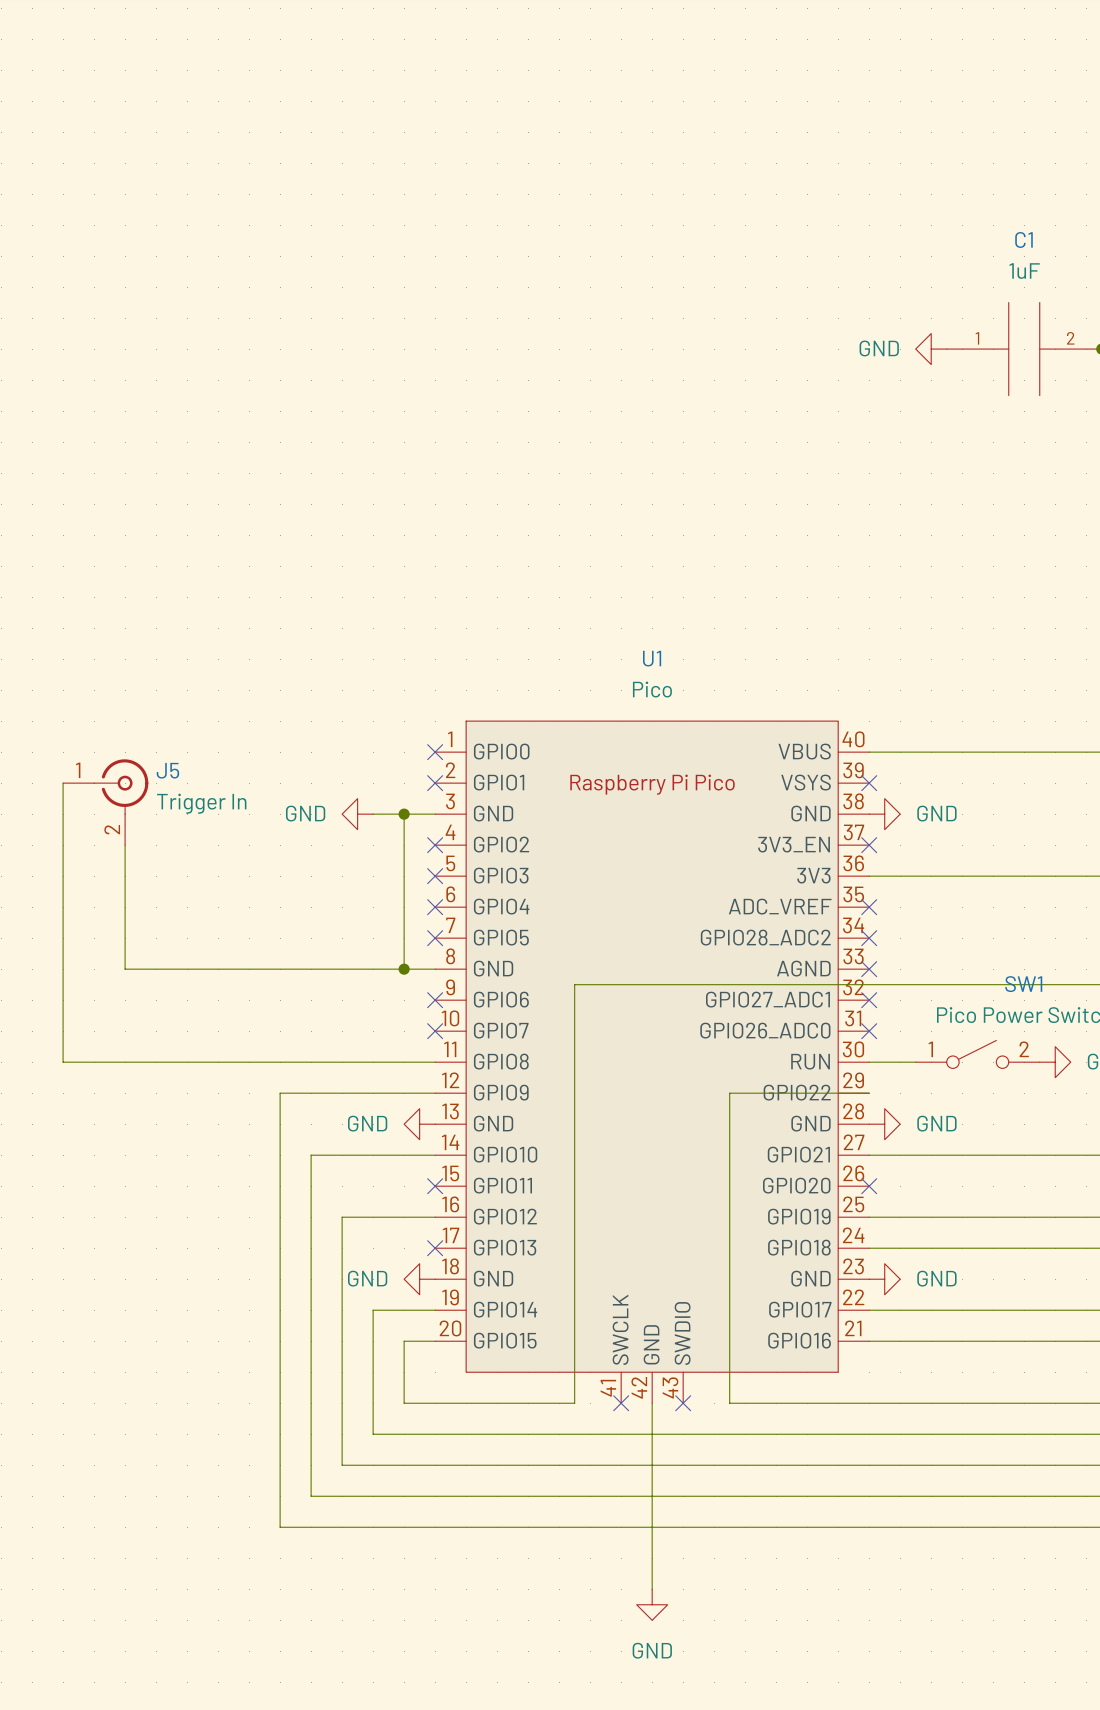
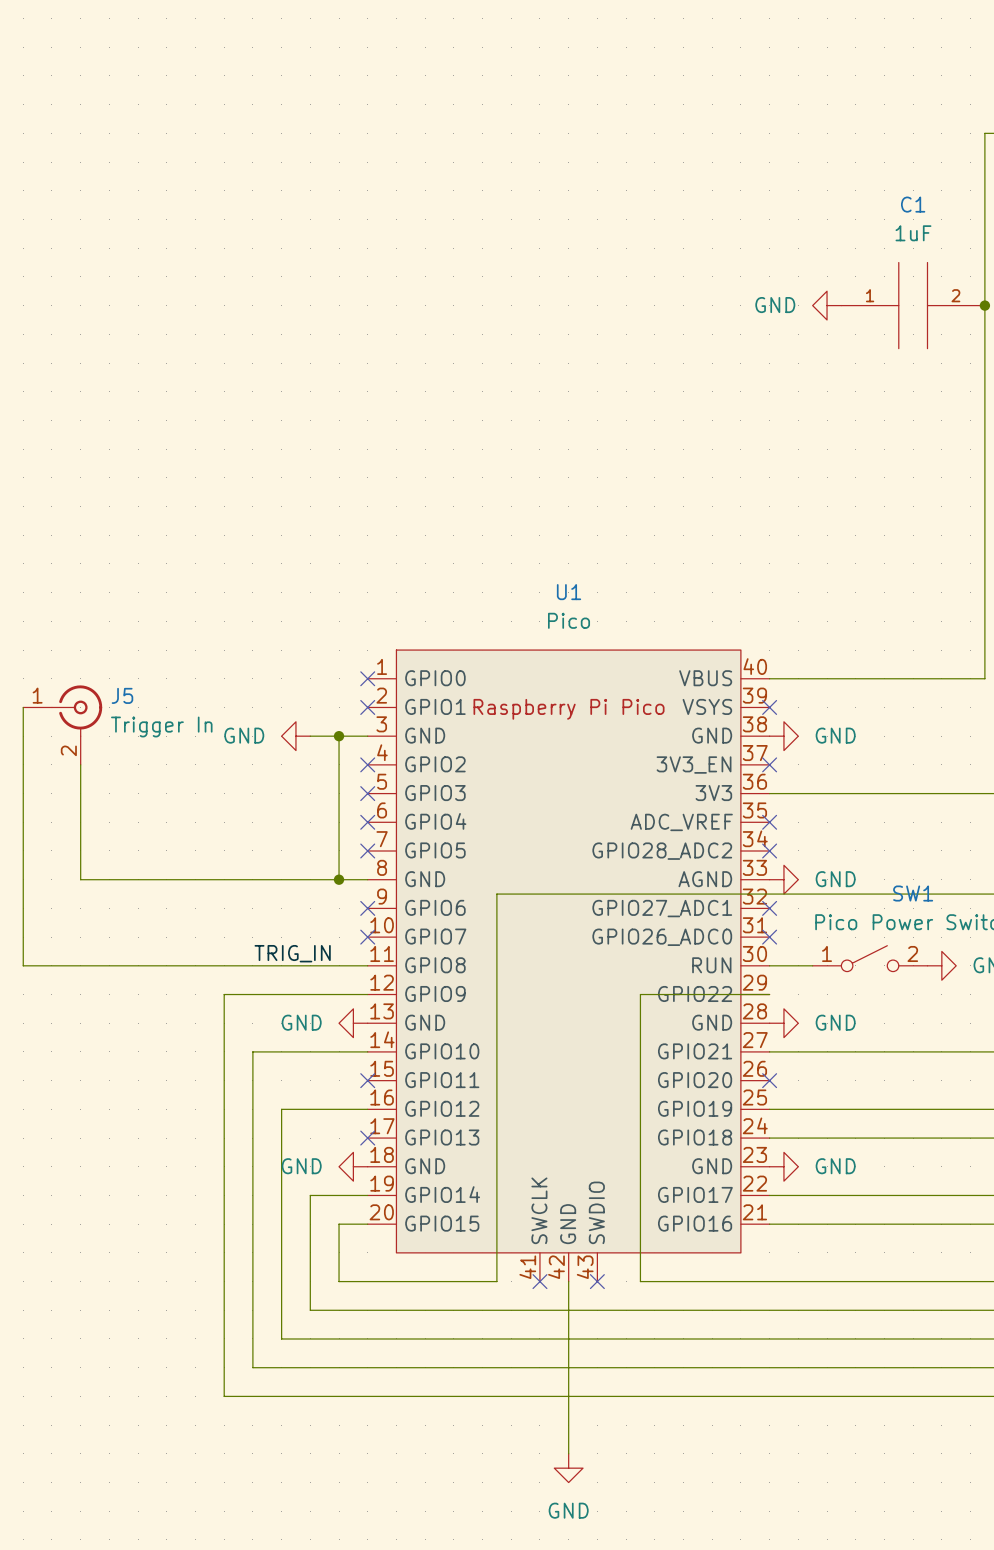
no-connect mark: (869, 969) -> none
power symbol: none -> GND (783, 879)
label: none -> TRIG_IN (292, 953)

